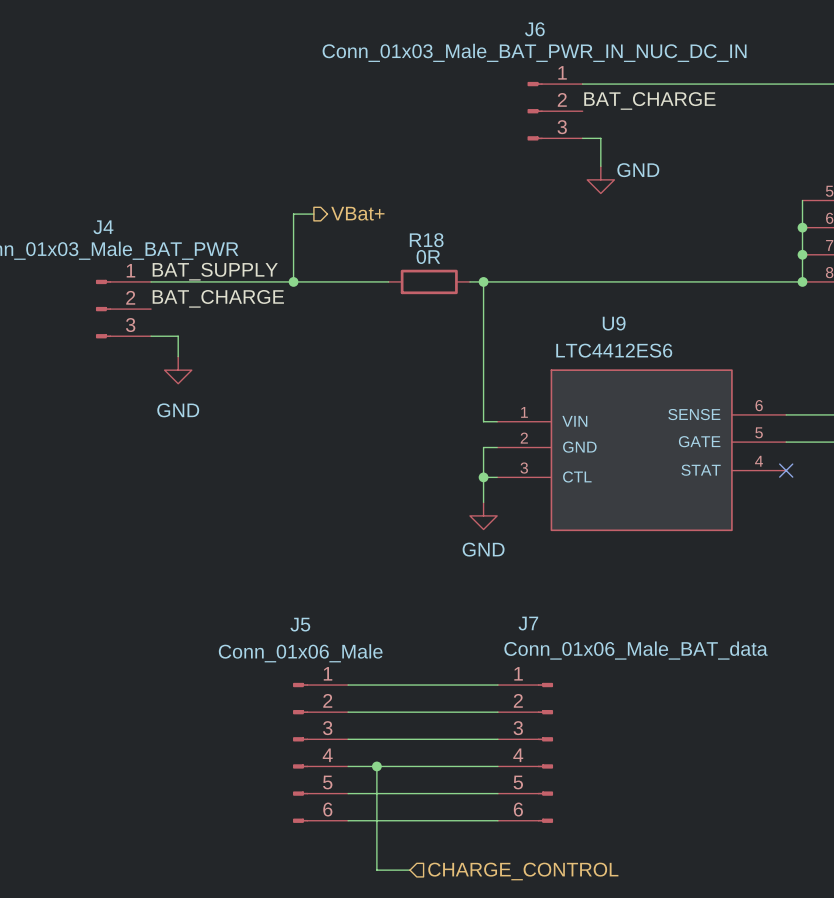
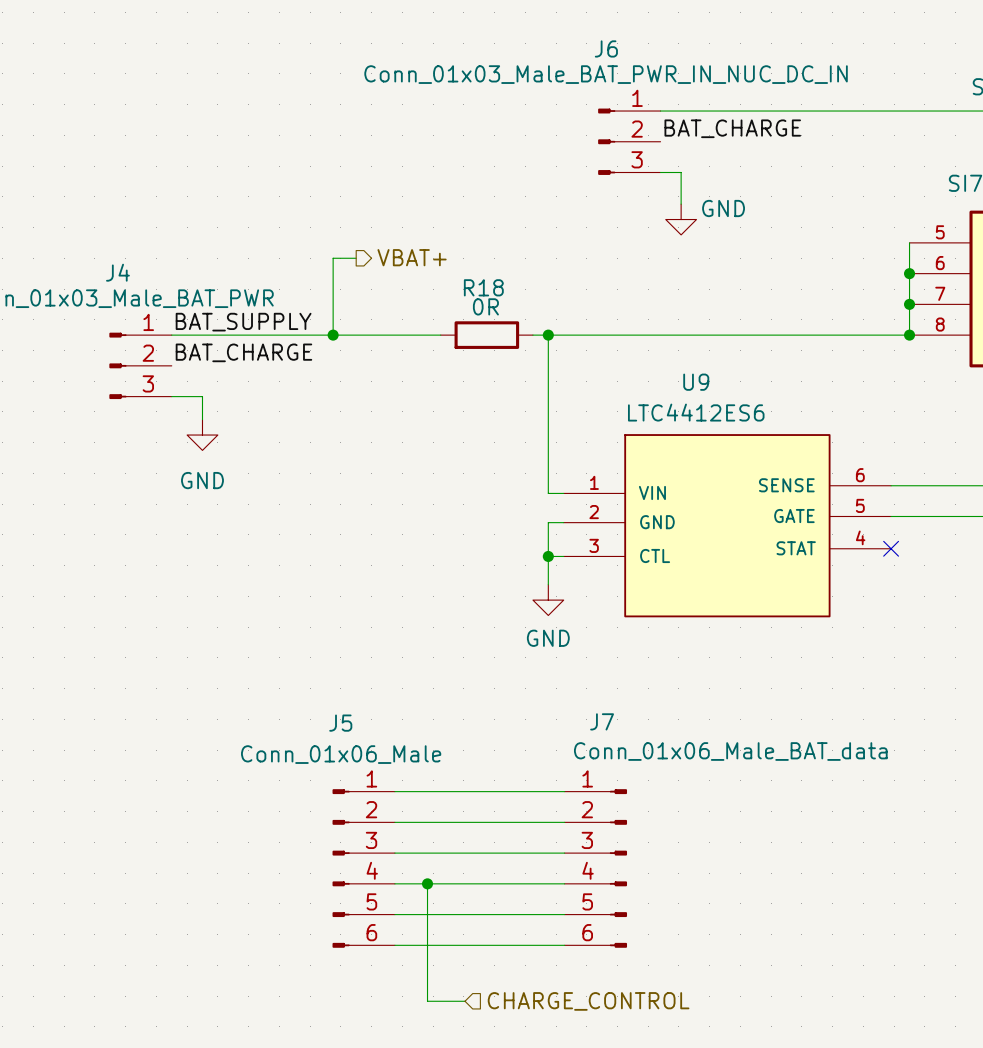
hierarchical label: VBat+ (357, 213) -> VBAT+ (412, 257)

